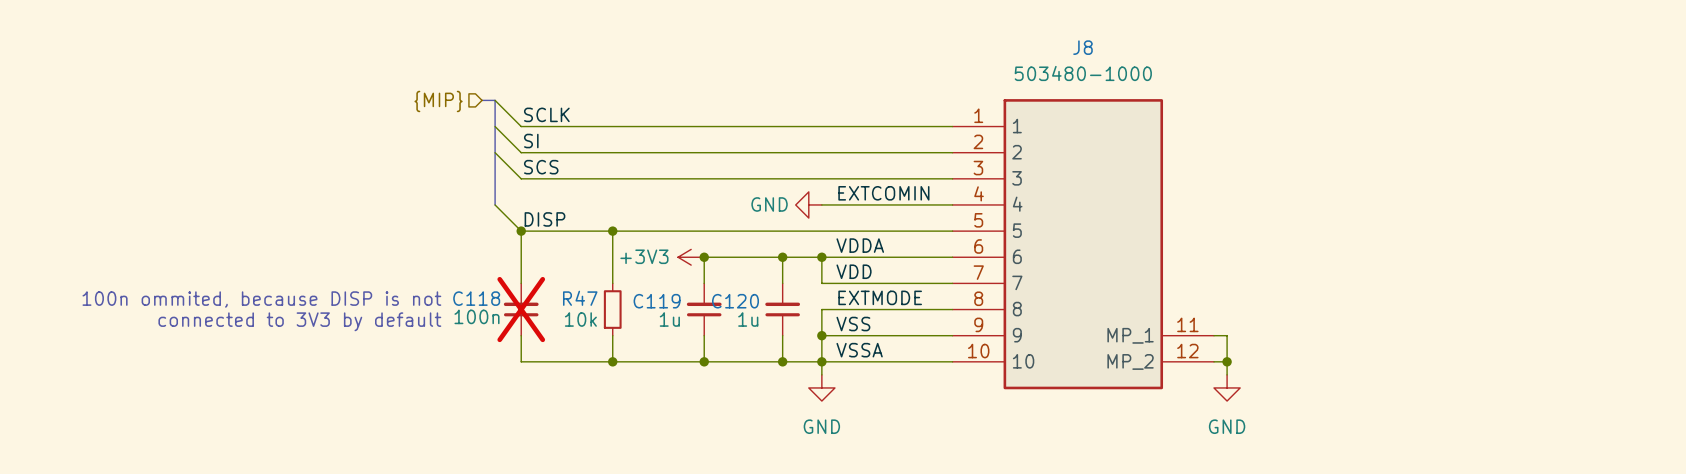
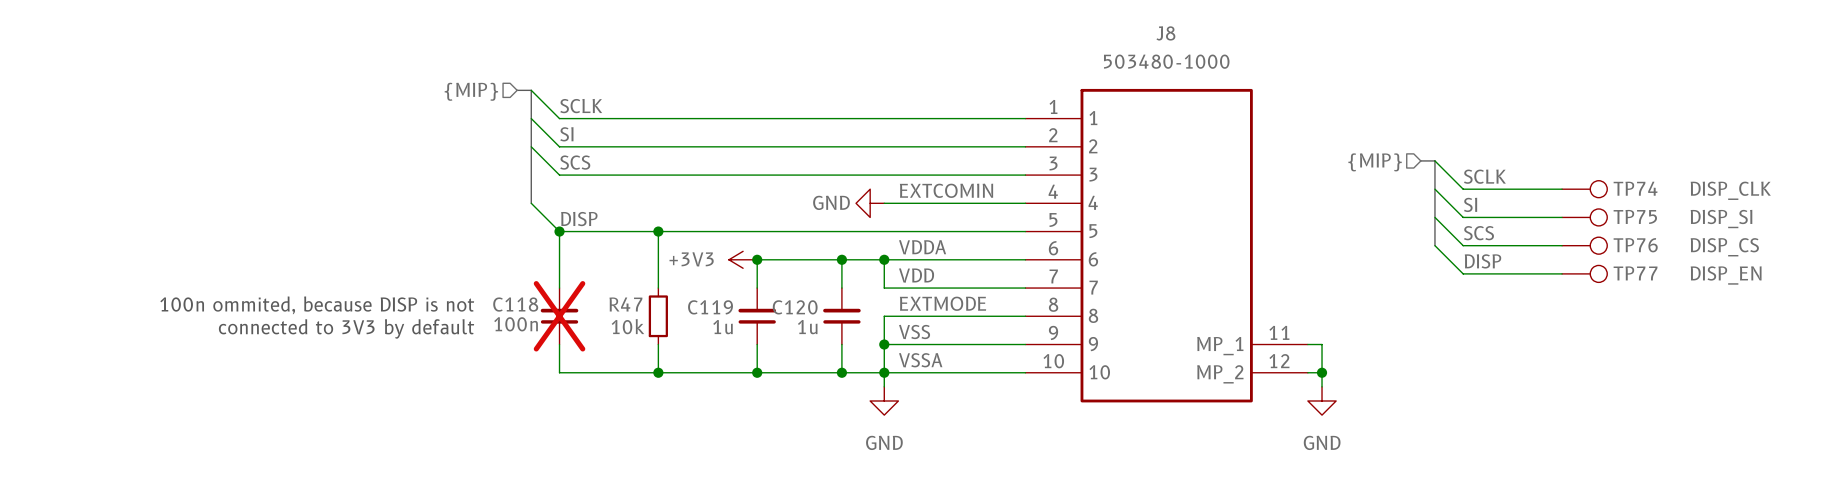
bus: none -> (1420, 160) (1434, 160) (1434, 245)
wire: none -> (1434, 160) (1463, 189) (1562, 189)
hierarchical label: none -> {MIP} (1375, 162)
label: none -> SCLK (1484, 176)
wire: none -> (1434, 189) (1463, 217) (1562, 217)
TP74: none -> DISP_CLK (1584, 189)
label: none -> SI (1470, 204)
wire: none -> (1434, 217) (1463, 245) (1562, 245)
TP75: none -> DISP_SI (1584, 217)
label: none -> SCS (1478, 233)
wire: none -> (1434, 245) (1463, 273) (1562, 273)
TP76: none -> DISP_CS (1584, 245)
label: none -> DISP (1483, 261)
TP77: none -> DISP_EN (1584, 273)

